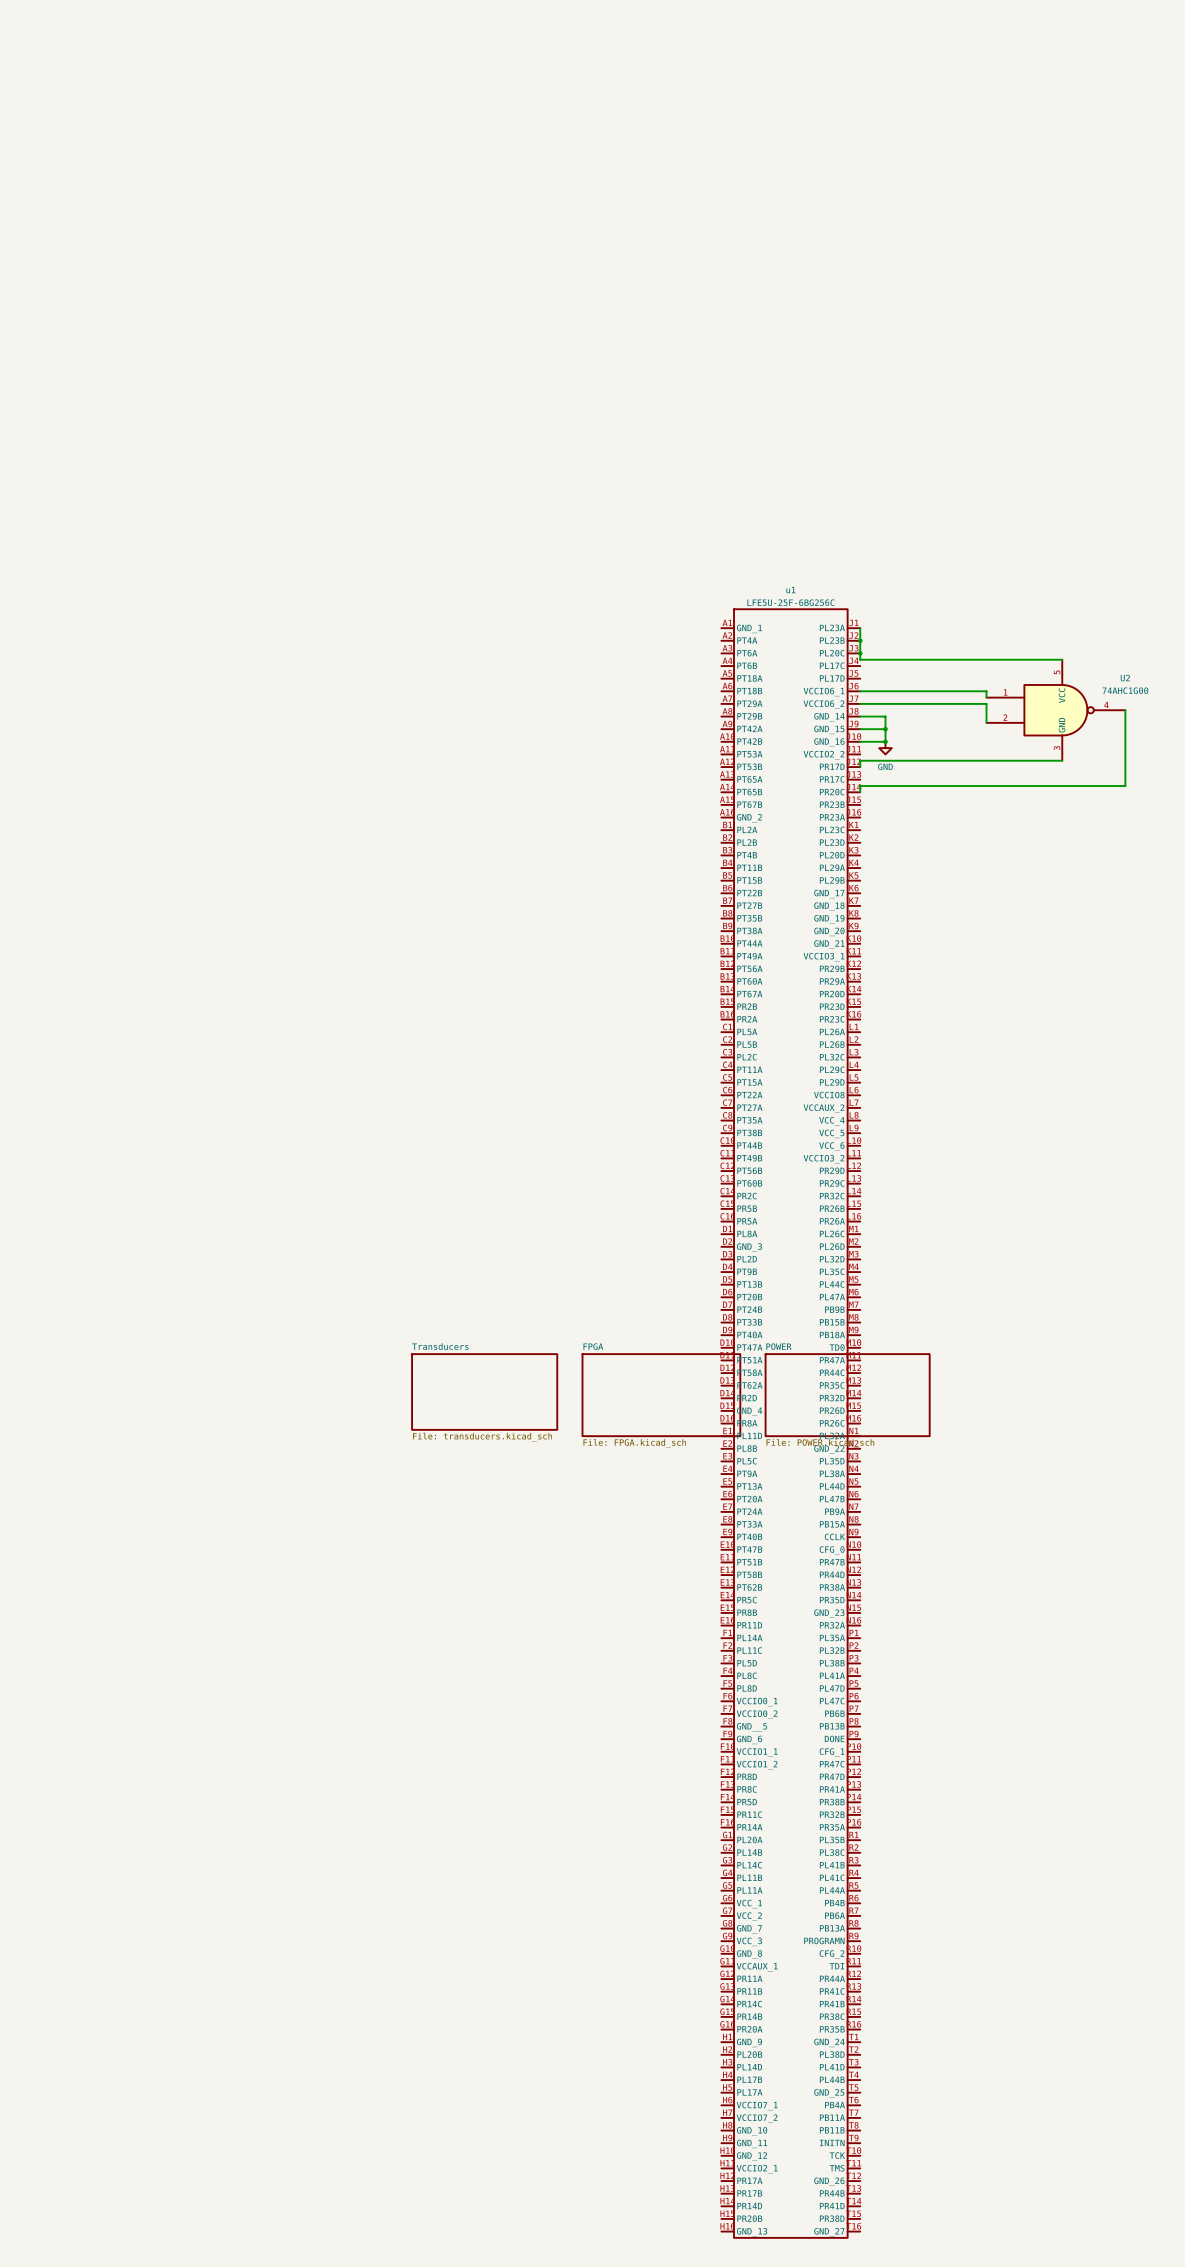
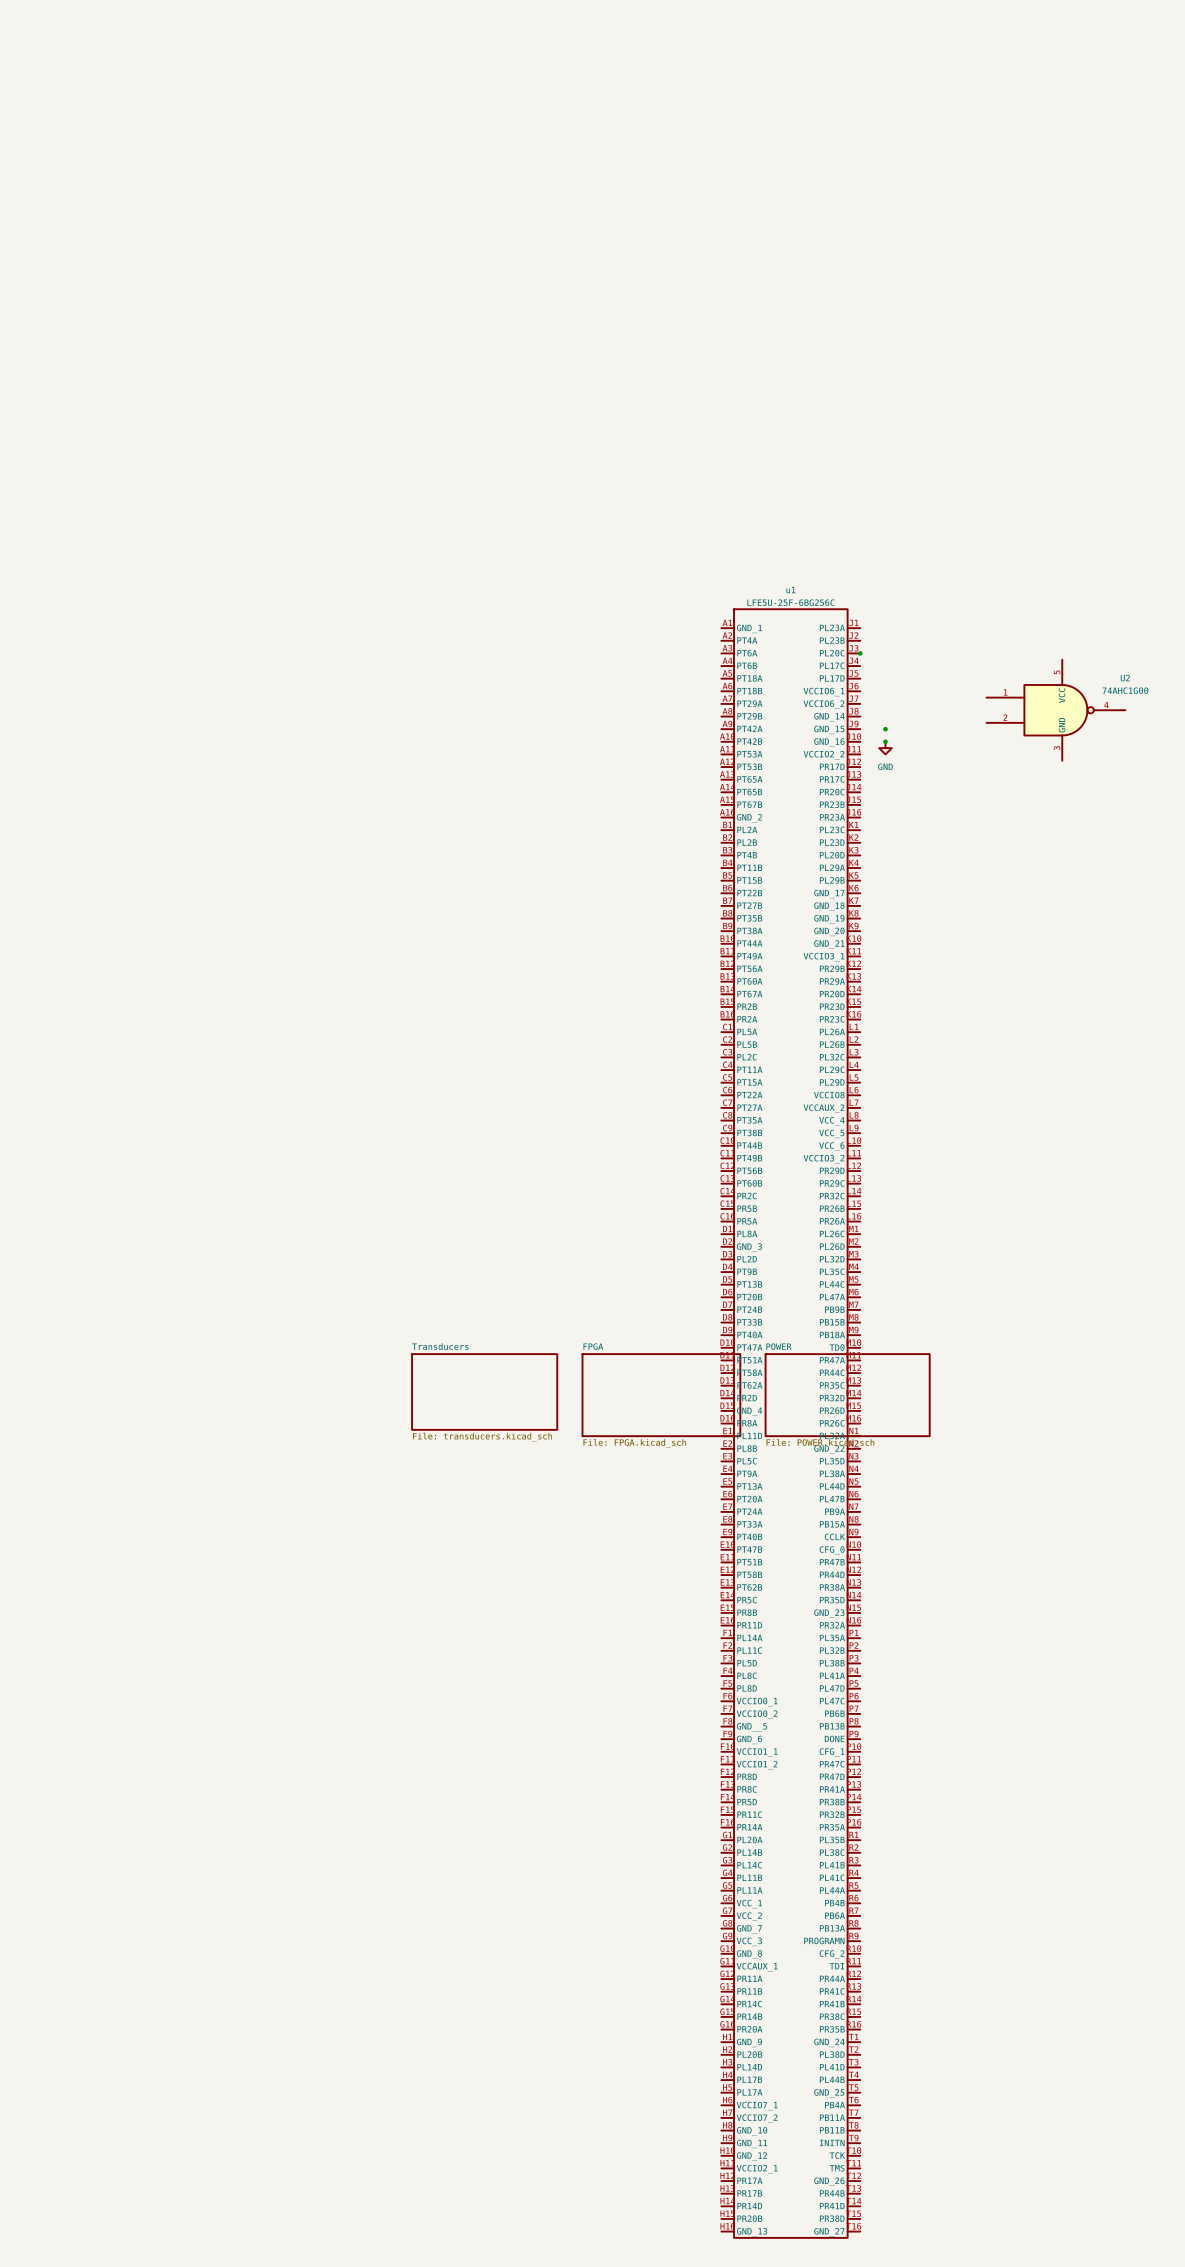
wire: (860, 628) (860, 659) (1062, 659) -> none
junction: (860, 640) -> none
wire: (860, 691) (986, 691) (986, 697) -> none
wire: (860, 703) (986, 703) (986, 722) -> none
wire: (1125, 710) (1125, 785) (860, 785) (860, 792) -> none
wire: (860, 716) (885, 716) (885, 741) (860, 741) -> none
wire: (860, 729) (885, 729) -> none
wire: (1062, 760) (860, 760) (860, 767) -> none

